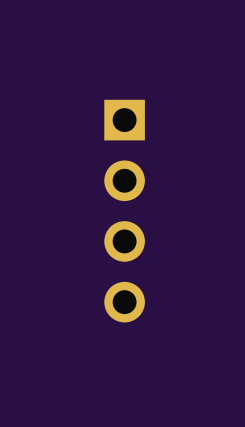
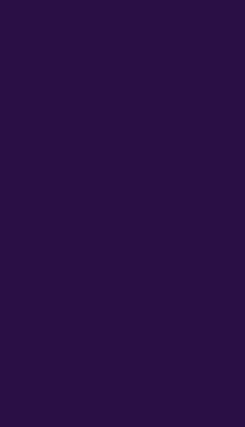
part: (124, 211) -> none

